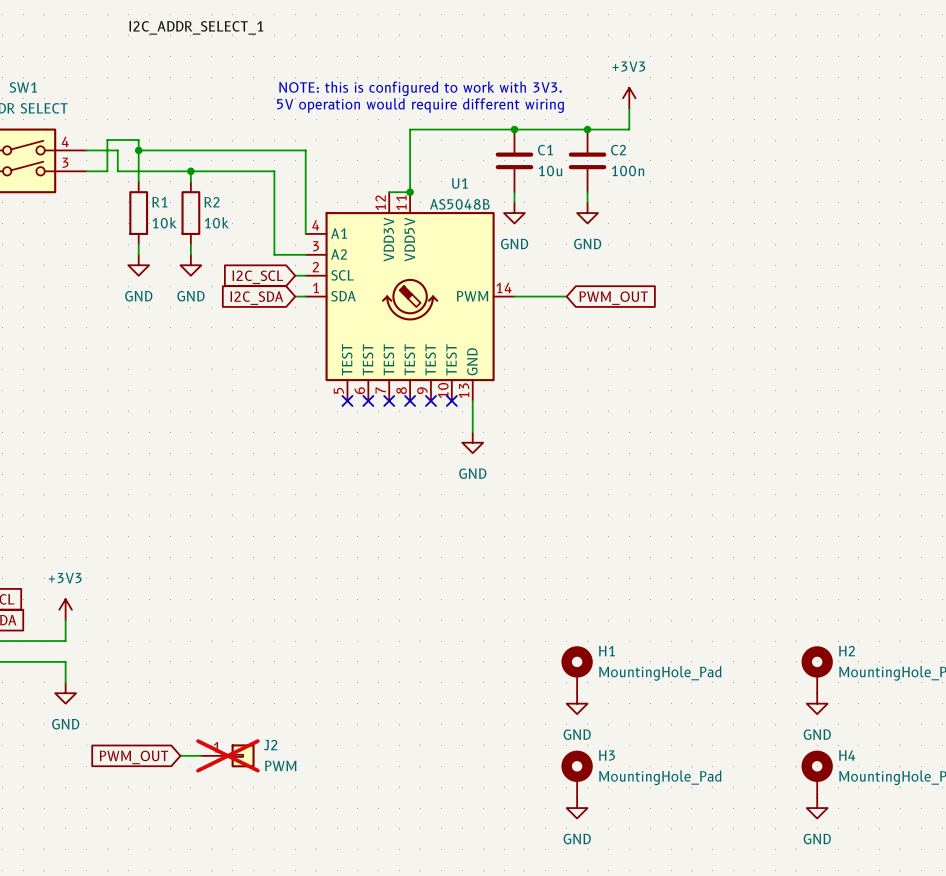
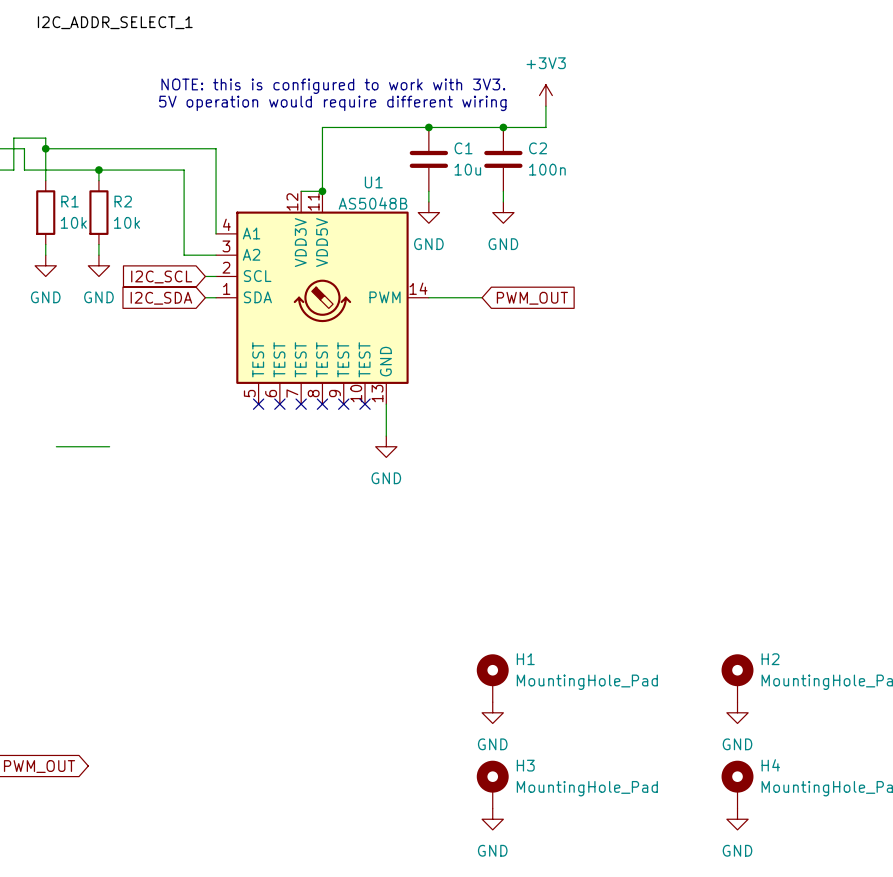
wire: none -> (56, 446) (109, 446)
wire: (180, 755) (201, 755) -> none
J2: PWM (227, 755) -> none

